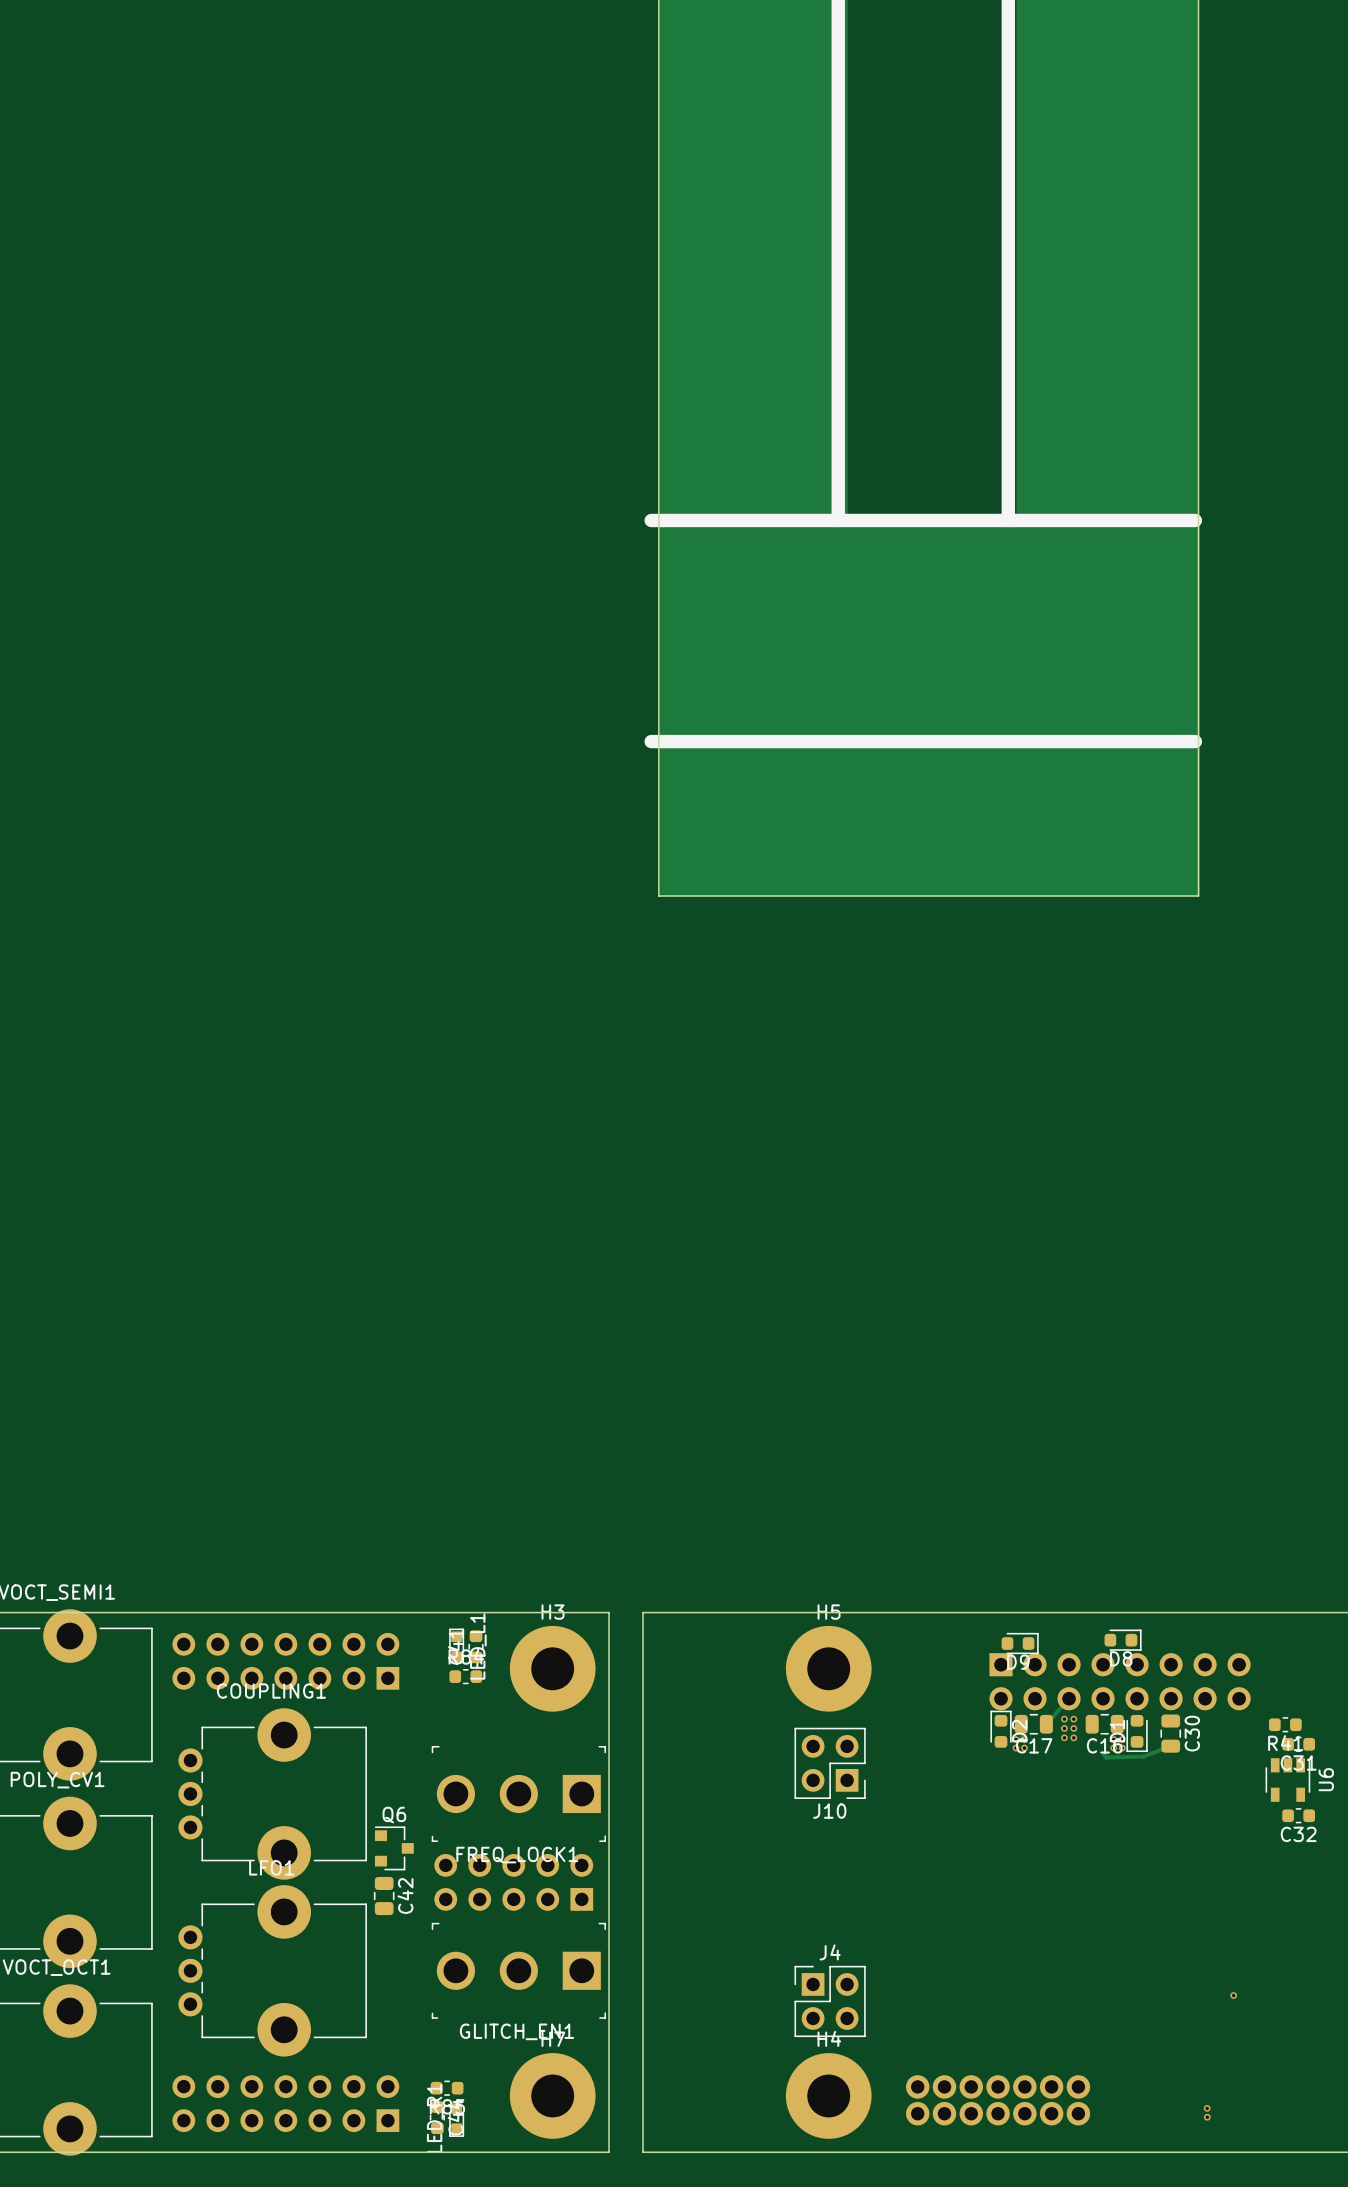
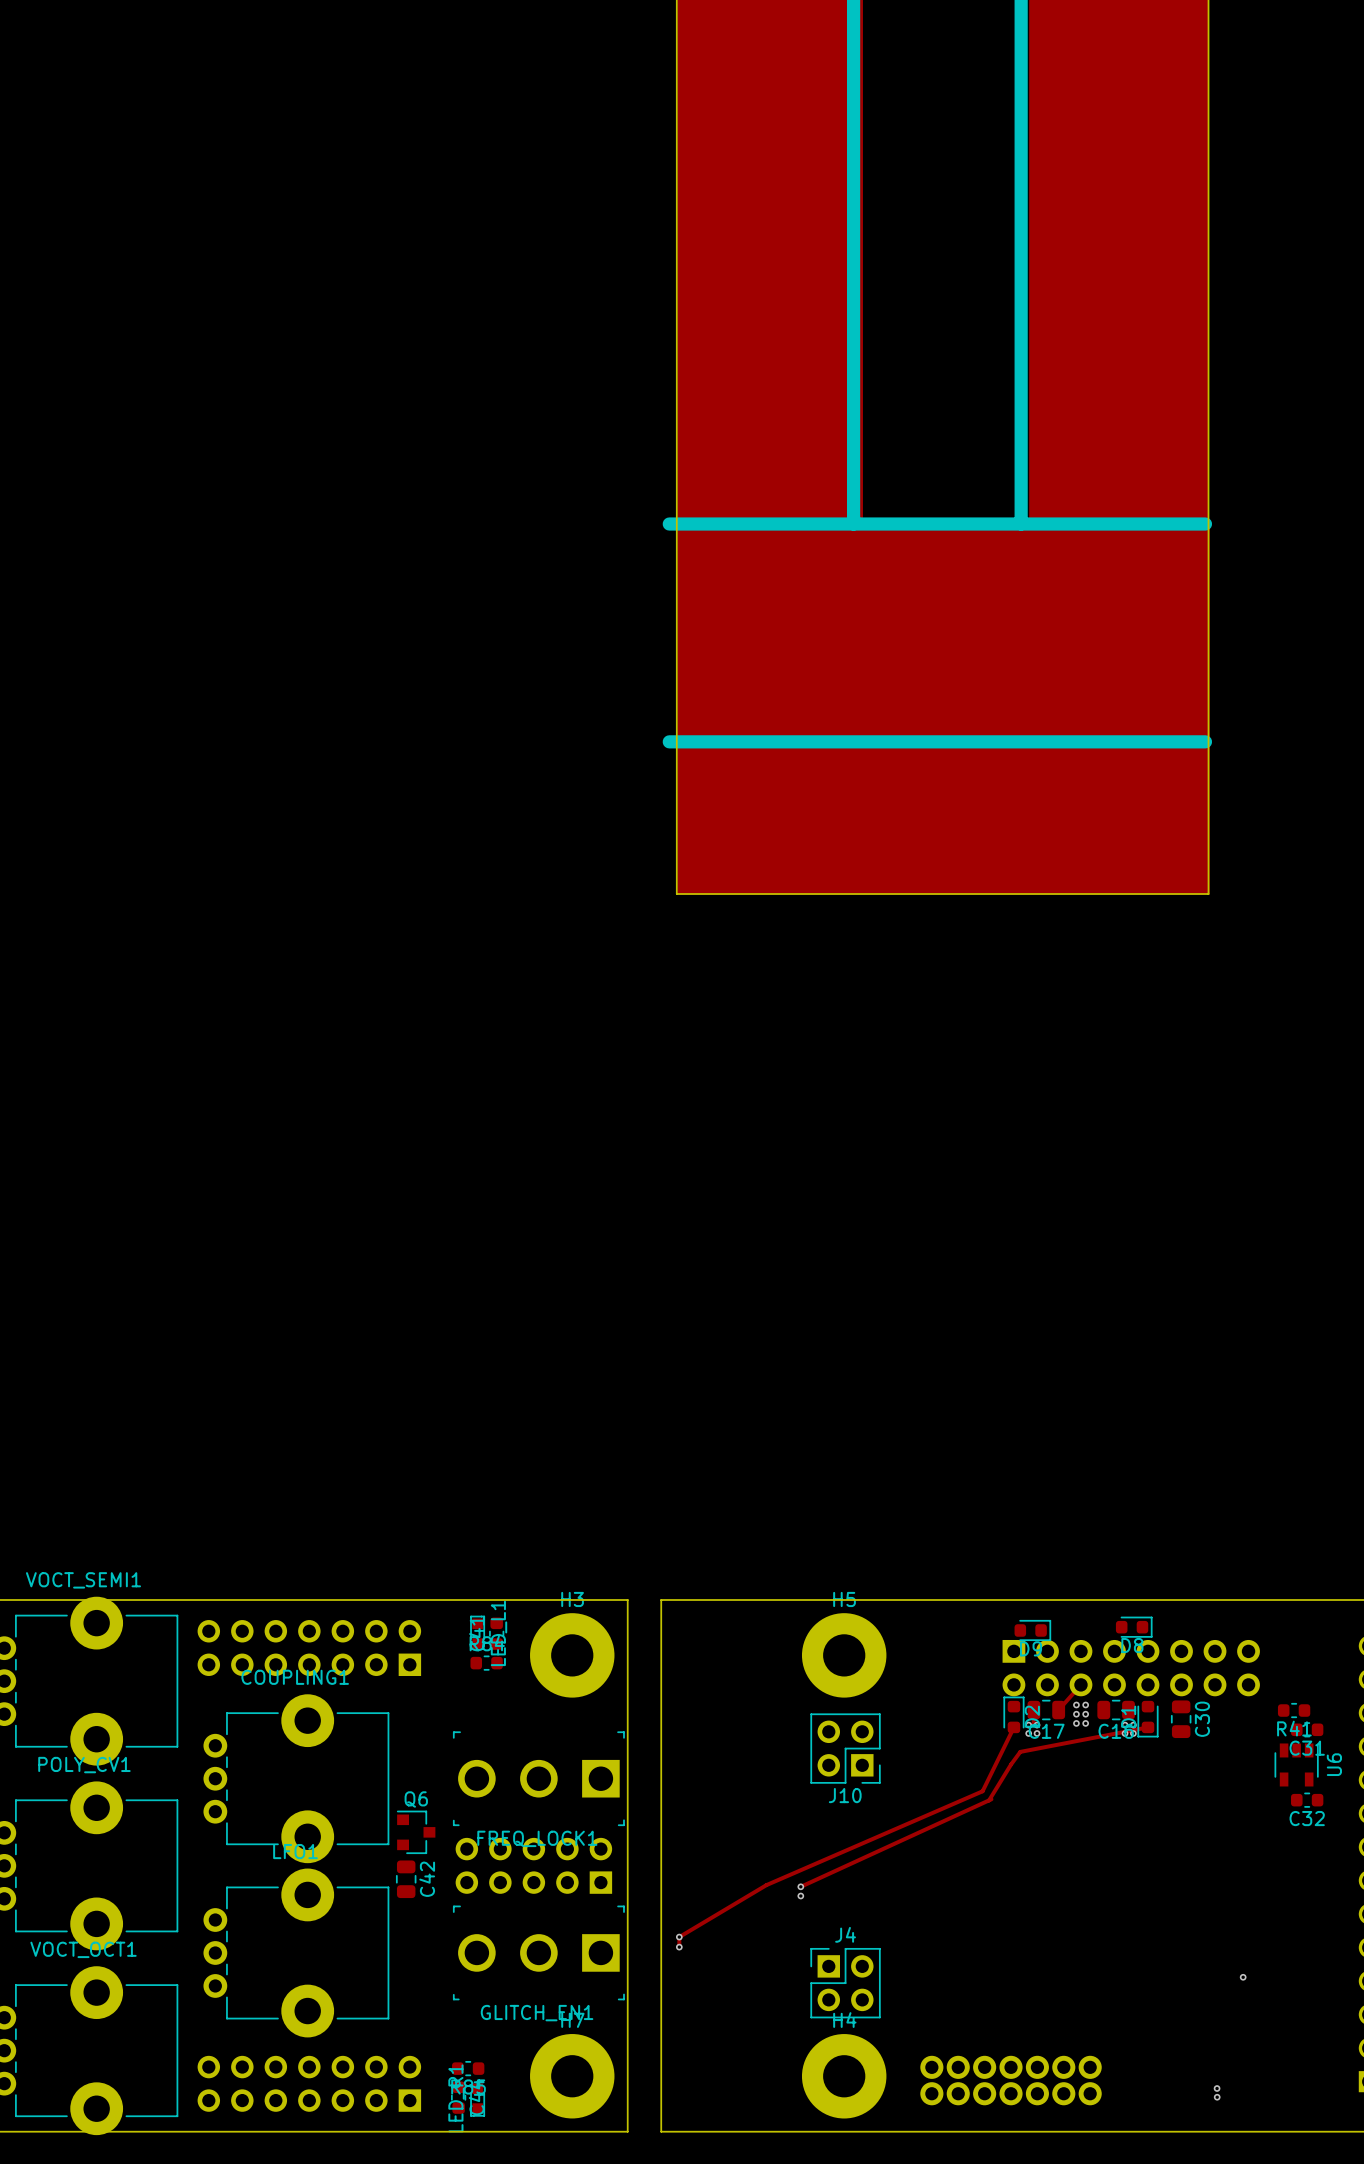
track: none -> (1013, 1727) (982, 1791) (766, 1885) (679, 1937) (679, 1947)
track: none -> (1148, 1727) (1020, 1751) (989, 1800)
track: (1170, 1746) (1143, 1756) (1105, 1757) (1104, 1754) (1107, 1757) -> none
track: none -> (991, 1799) (800, 1886)
via: none -> (800, 1886)
via: none -> (800, 1896)
via: none -> (679, 1937)
via: none -> (679, 1947)

